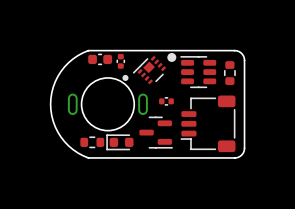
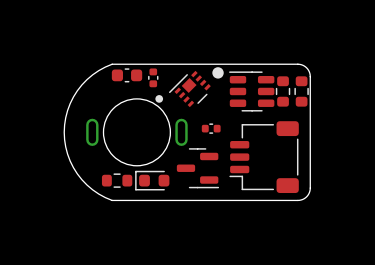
part: none -> (283, 91)
part: none -> (301, 91)
part: (229, 73) -> none

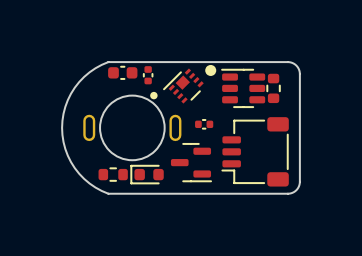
part: (301, 91) -> none

